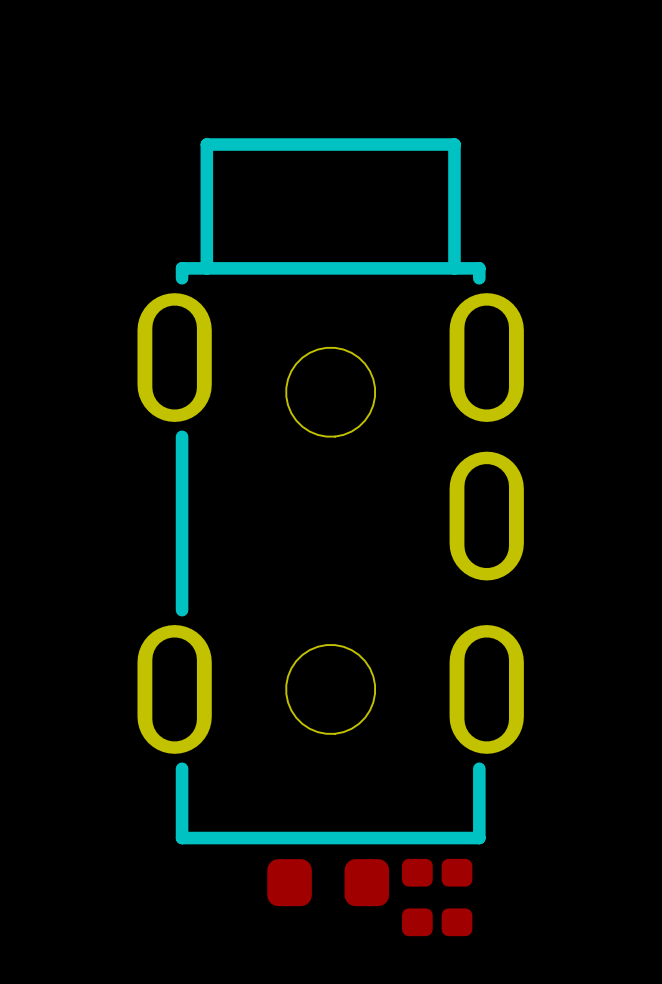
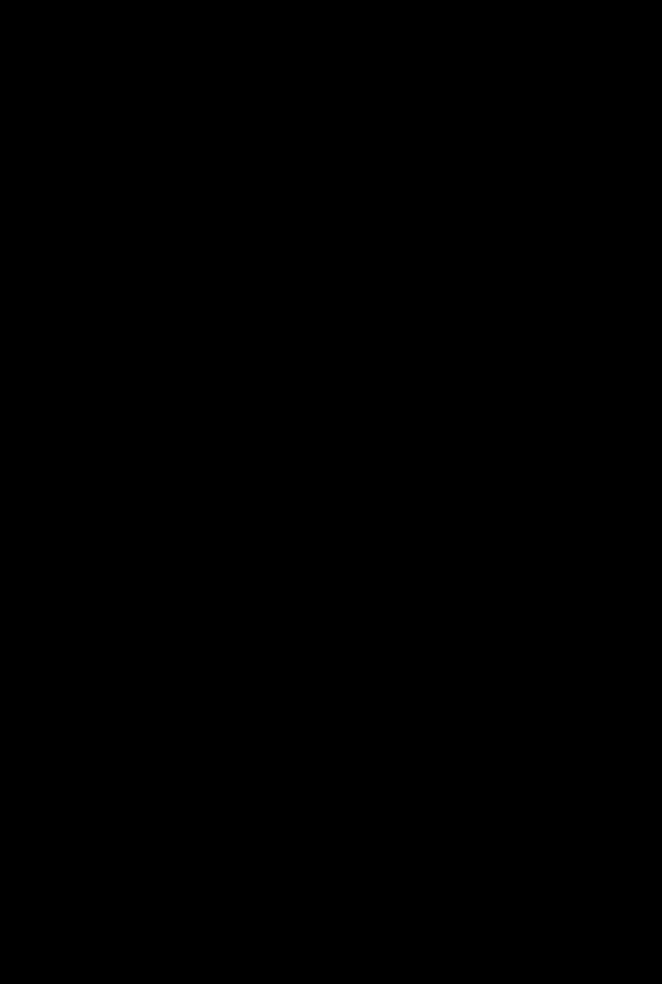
part: (330, 491) -> none
part: (328, 882) -> none
part: (417, 897) -> none
part: (456, 897) -> none

